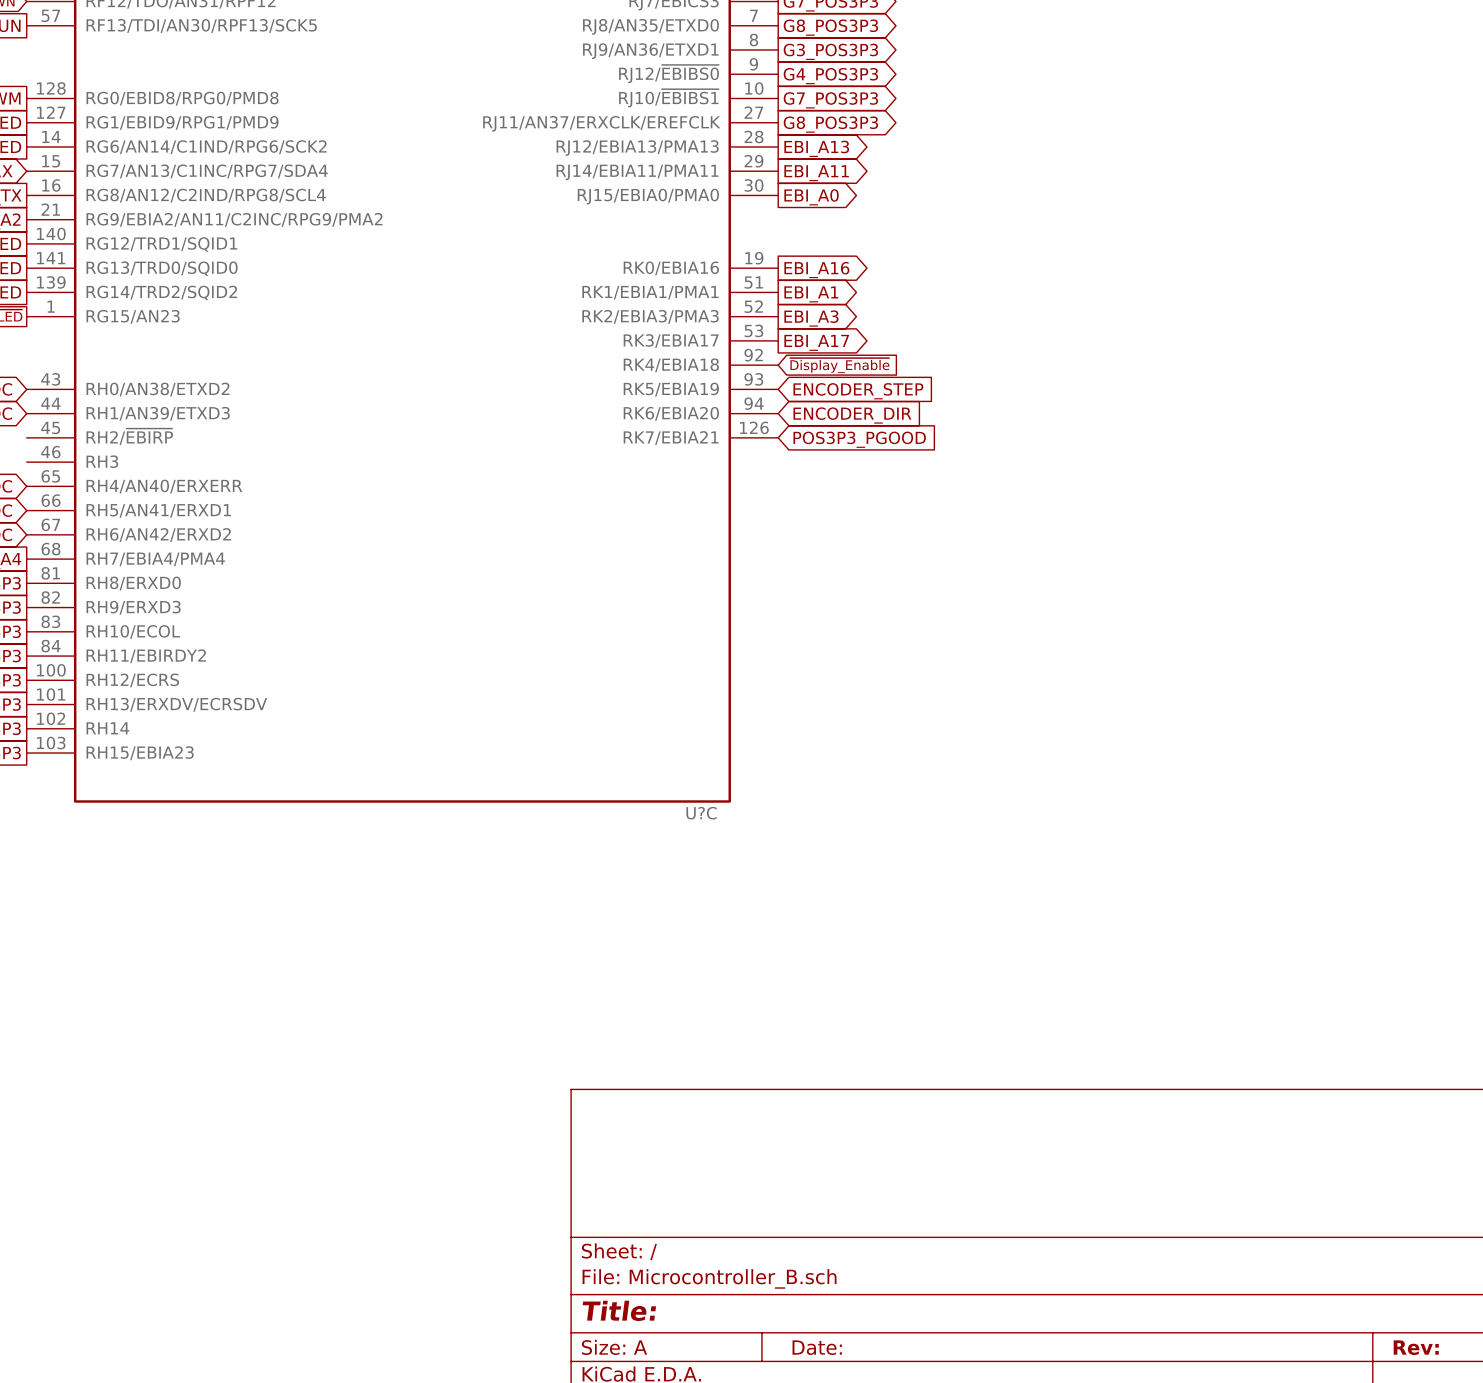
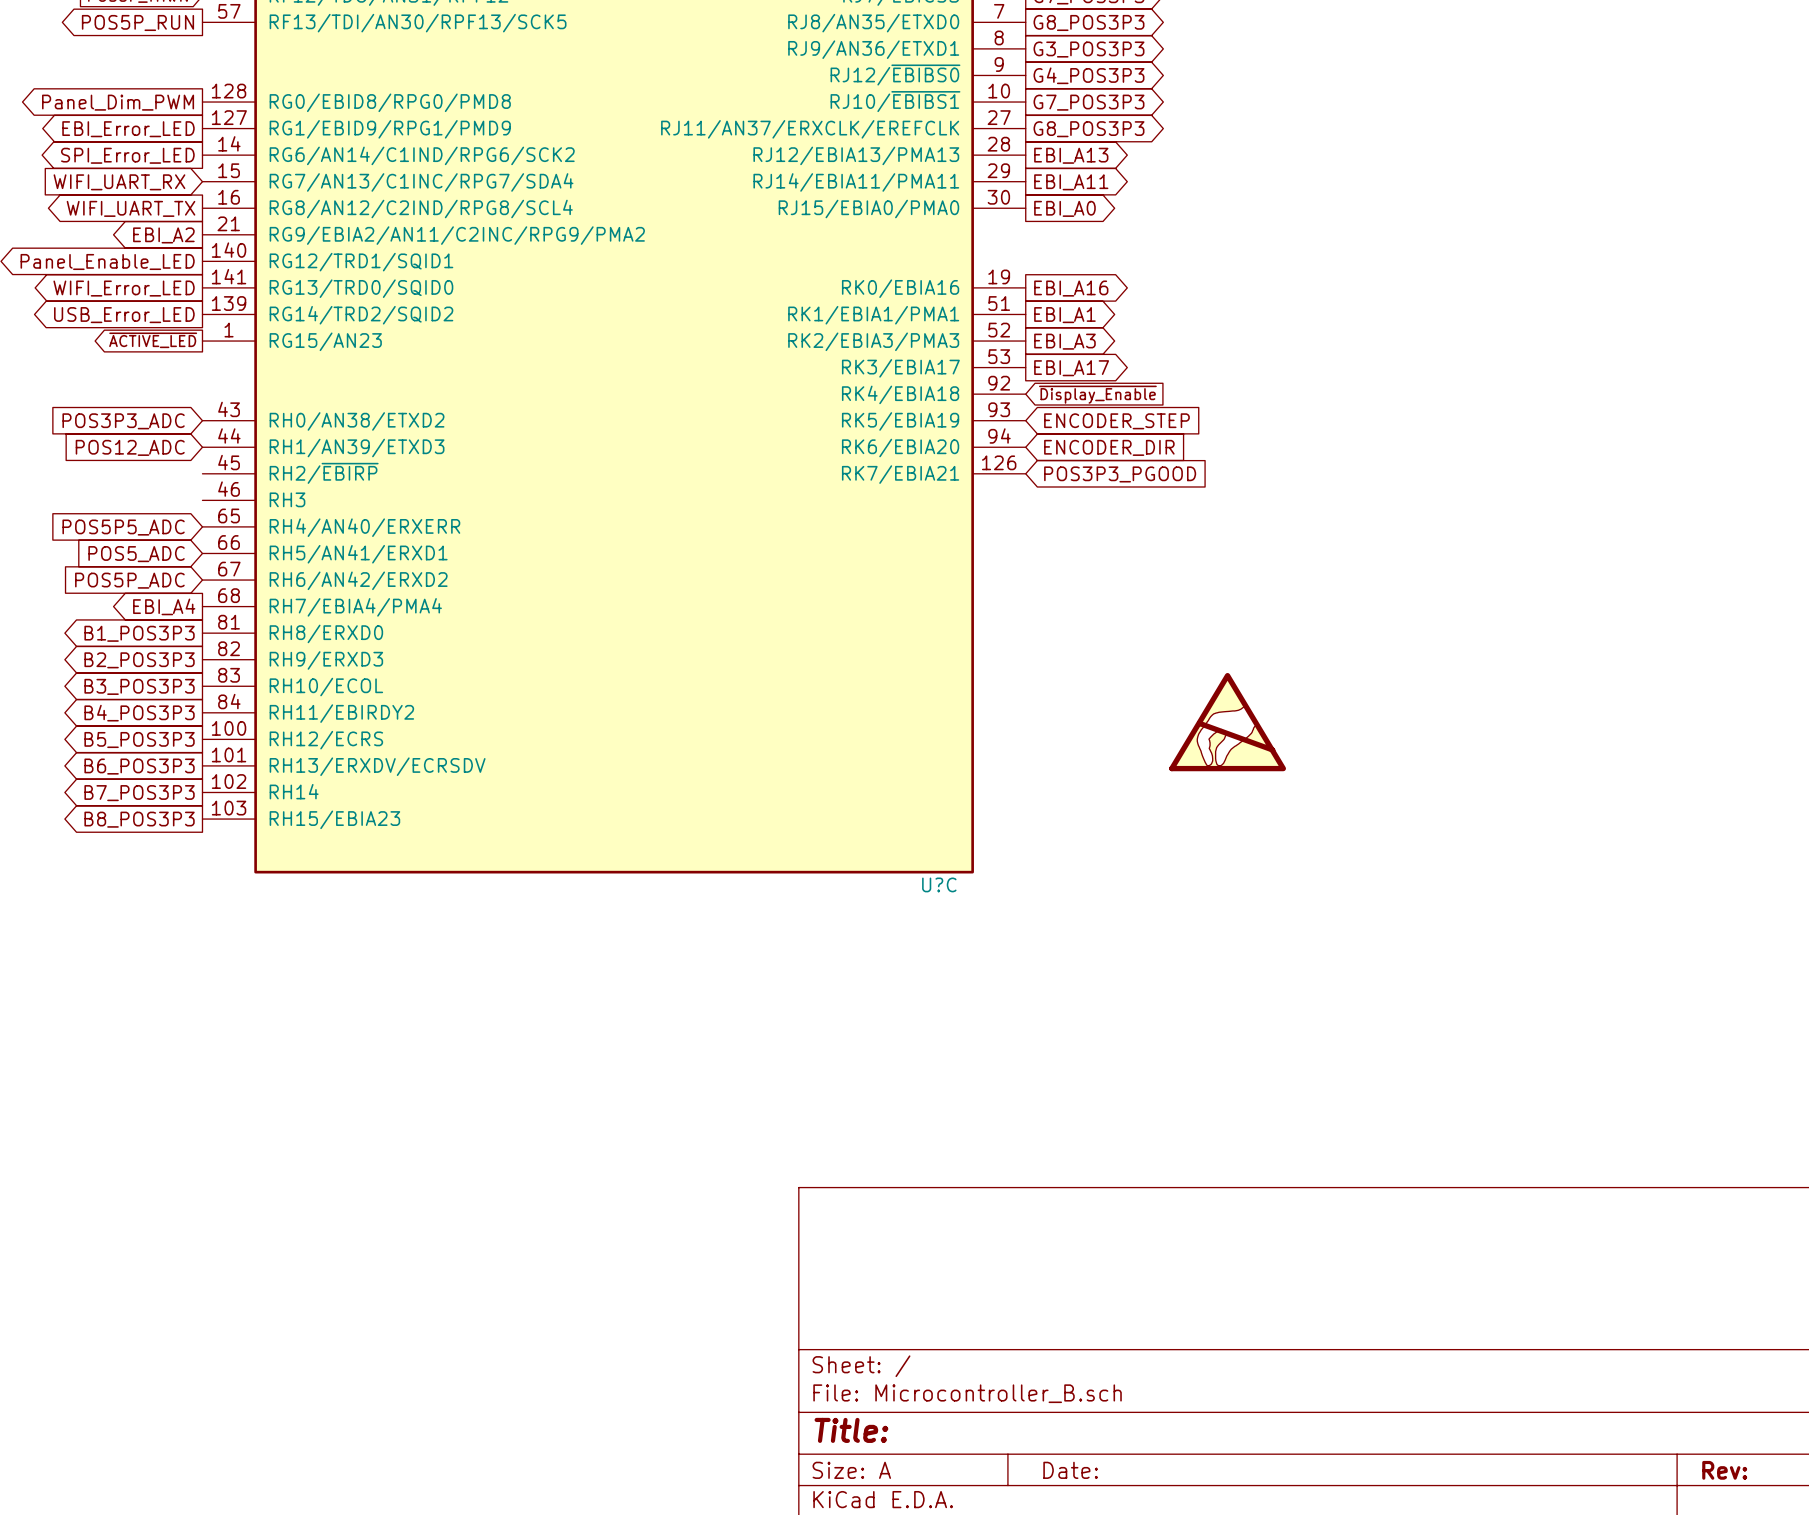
power symbol: none -> (1227, 722)

